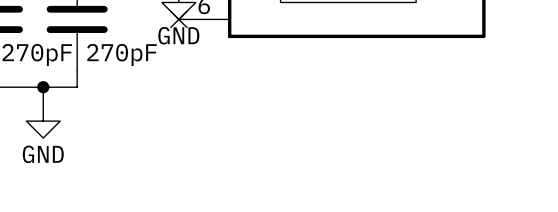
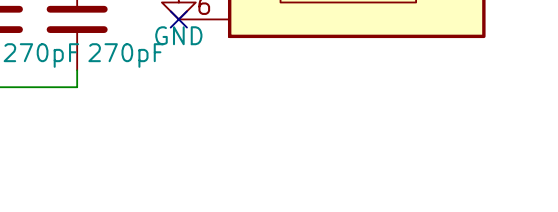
wire: (43, 87) (43, 104) -> none
junction: (43, 87) -> none
power symbol: GND (43, 121) -> none

